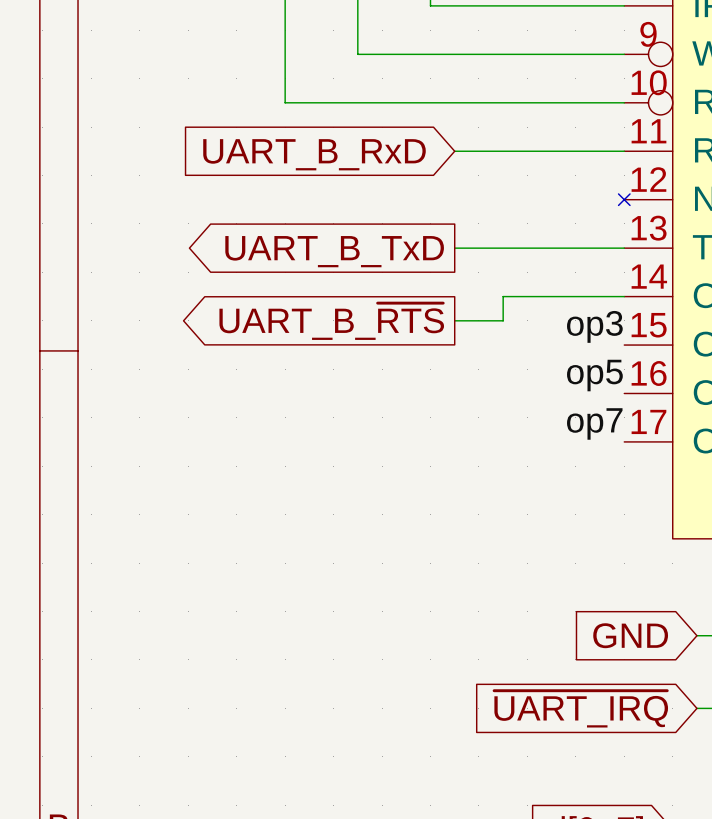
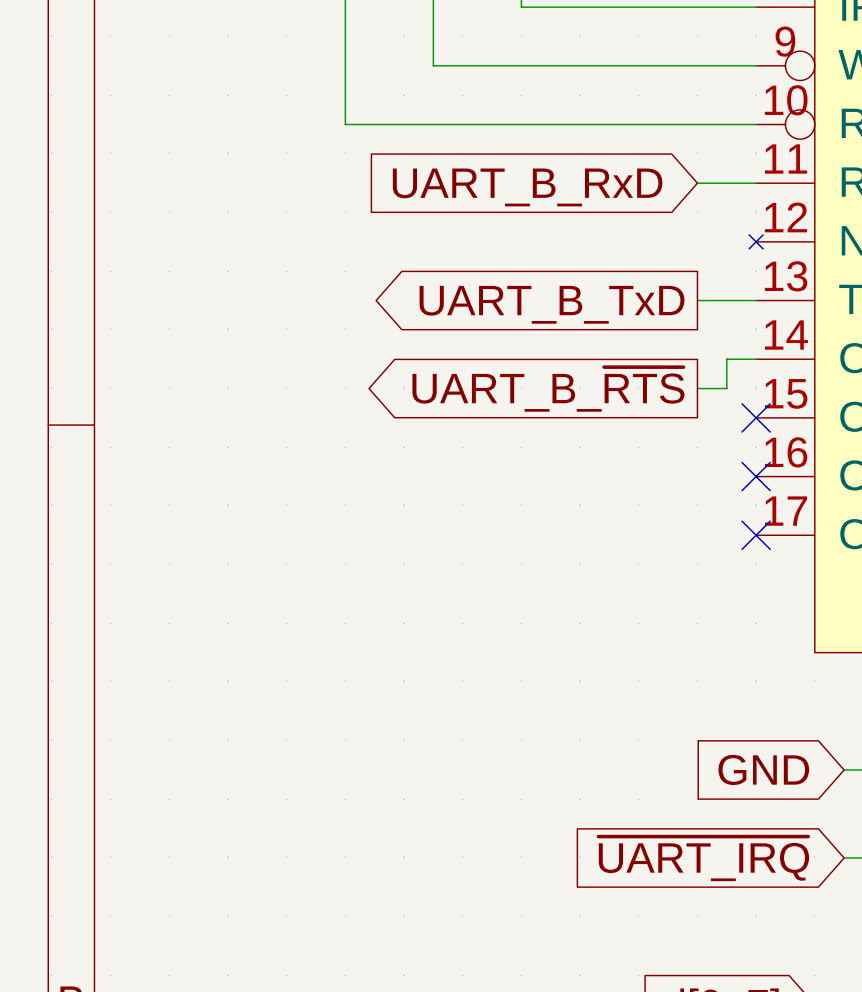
wire: (454, 151) (575, 151) -> none
global label position: UART_B_RxD (314, 154) -> UART_B_RxD (527, 187)
wire: (454, 248) (575, 248) -> none
global label position: UART_B_TxD (334, 251) -> UART_B_TxD (551, 304)
wire: (600, 296) (503, 296) (503, 320) (454, 320) -> (726, 359) (726, 388) (697, 388)
global label position: UART_B_~{RTS} (331, 321) -> UART_B_~{RTS} (548, 389)
label: op3 (594, 326) -> none
no-connect mark: none -> (756, 417)
label: op5 (594, 375) -> none
no-connect mark: none -> (756, 476)
label: op7 (594, 423) -> none
no-connect mark: none -> (756, 535)

